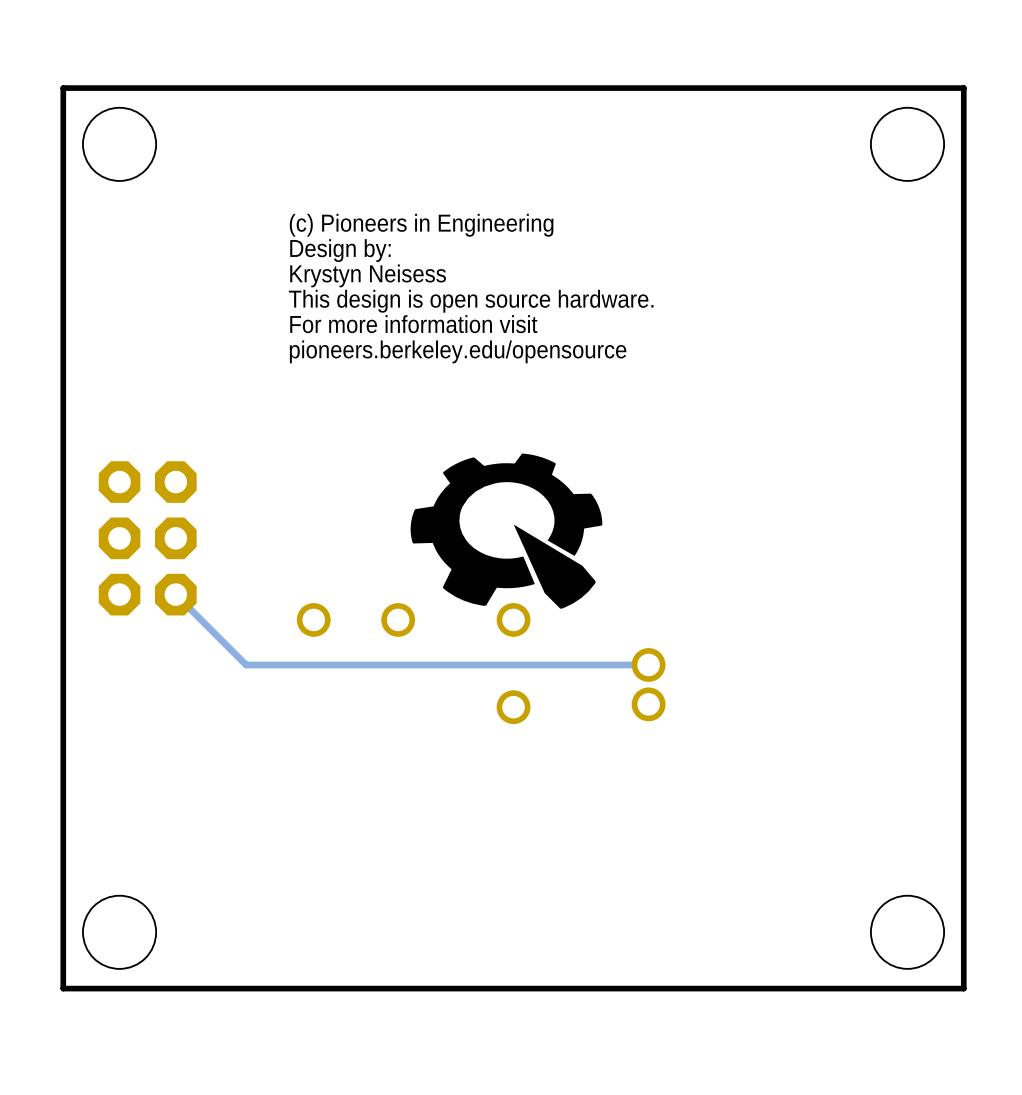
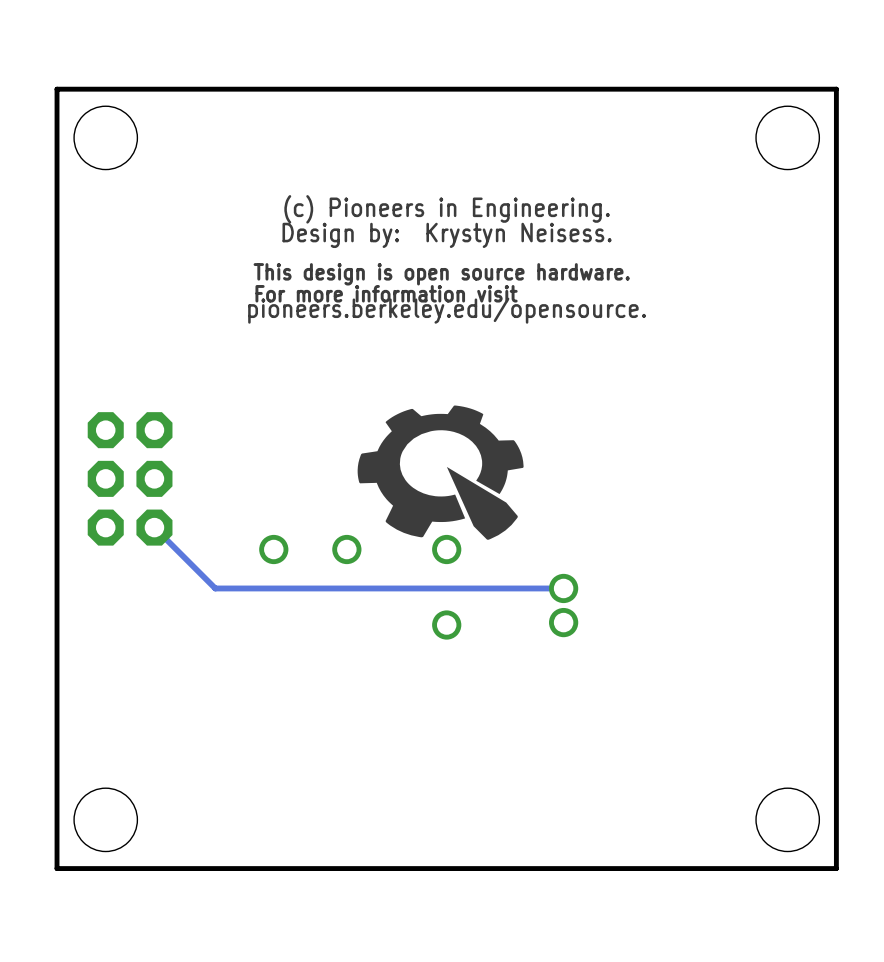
text: (c) Pioneers in Engineering (421, 225) -> (c) Pioneers in Engineering. (447, 209)
text: Design by: (340, 250) -> none
text: Krystyn Neisess (368, 275) -> Design by: Krystyn Neisess. (447, 235)
text: pioneers.berkeley.edu/opensource (458, 351) -> pioneers.berkeley.edu/opensource. (447, 310)

